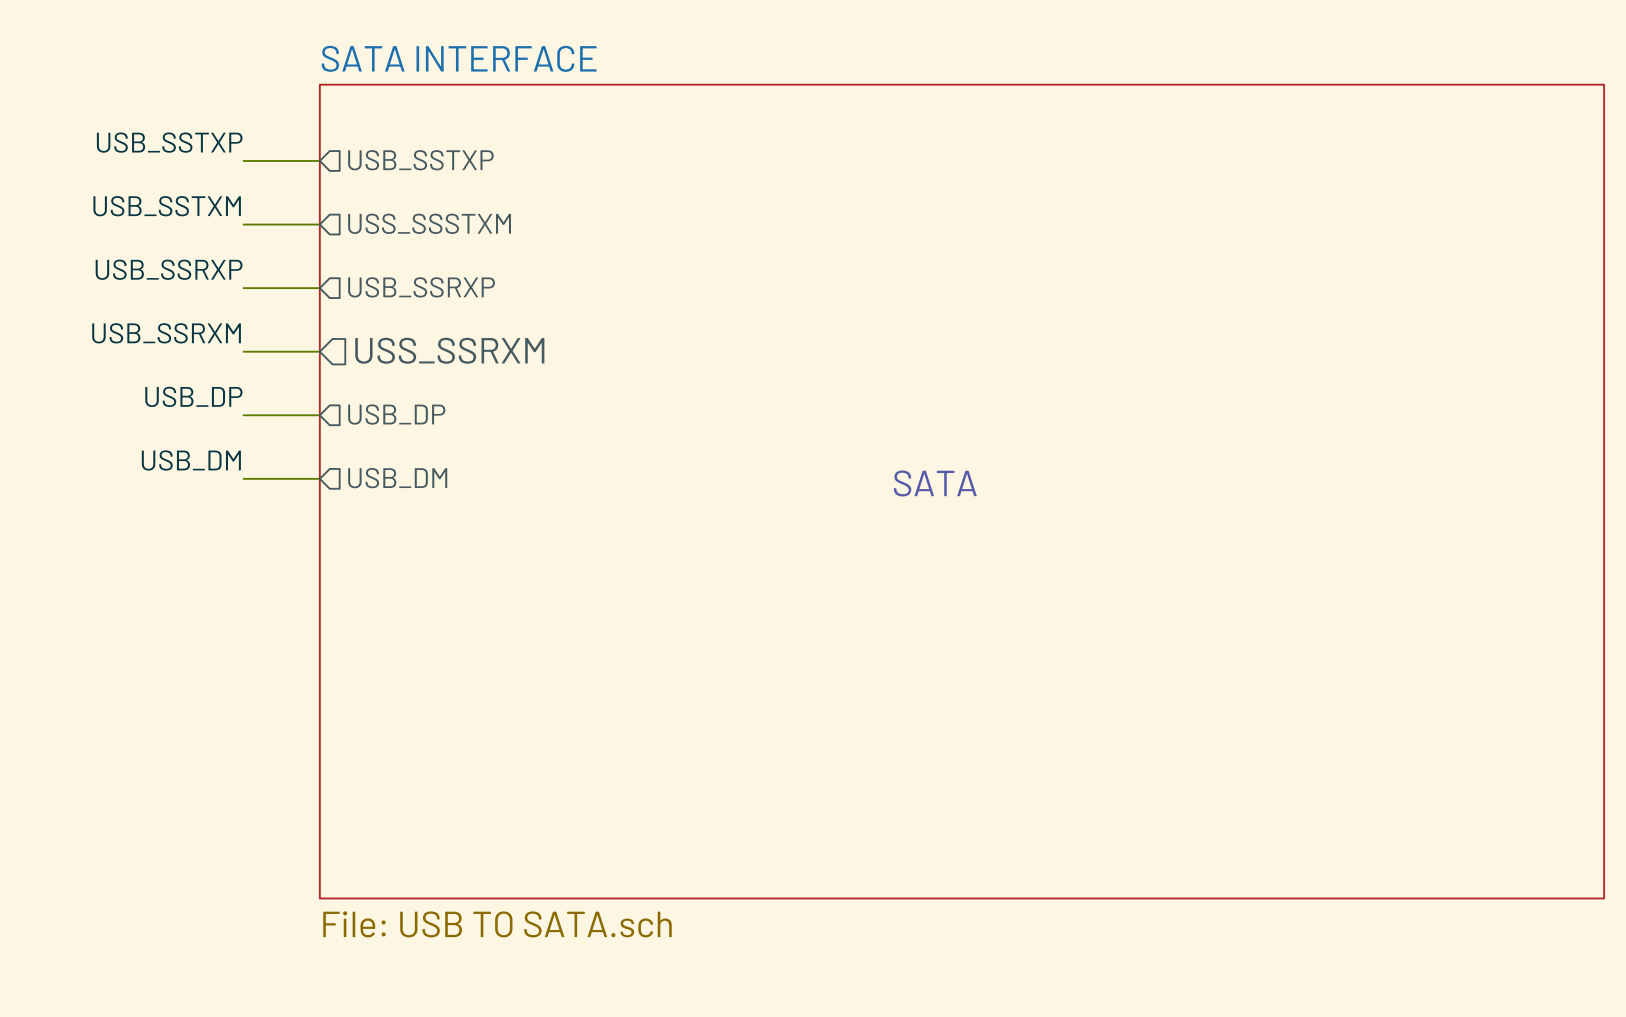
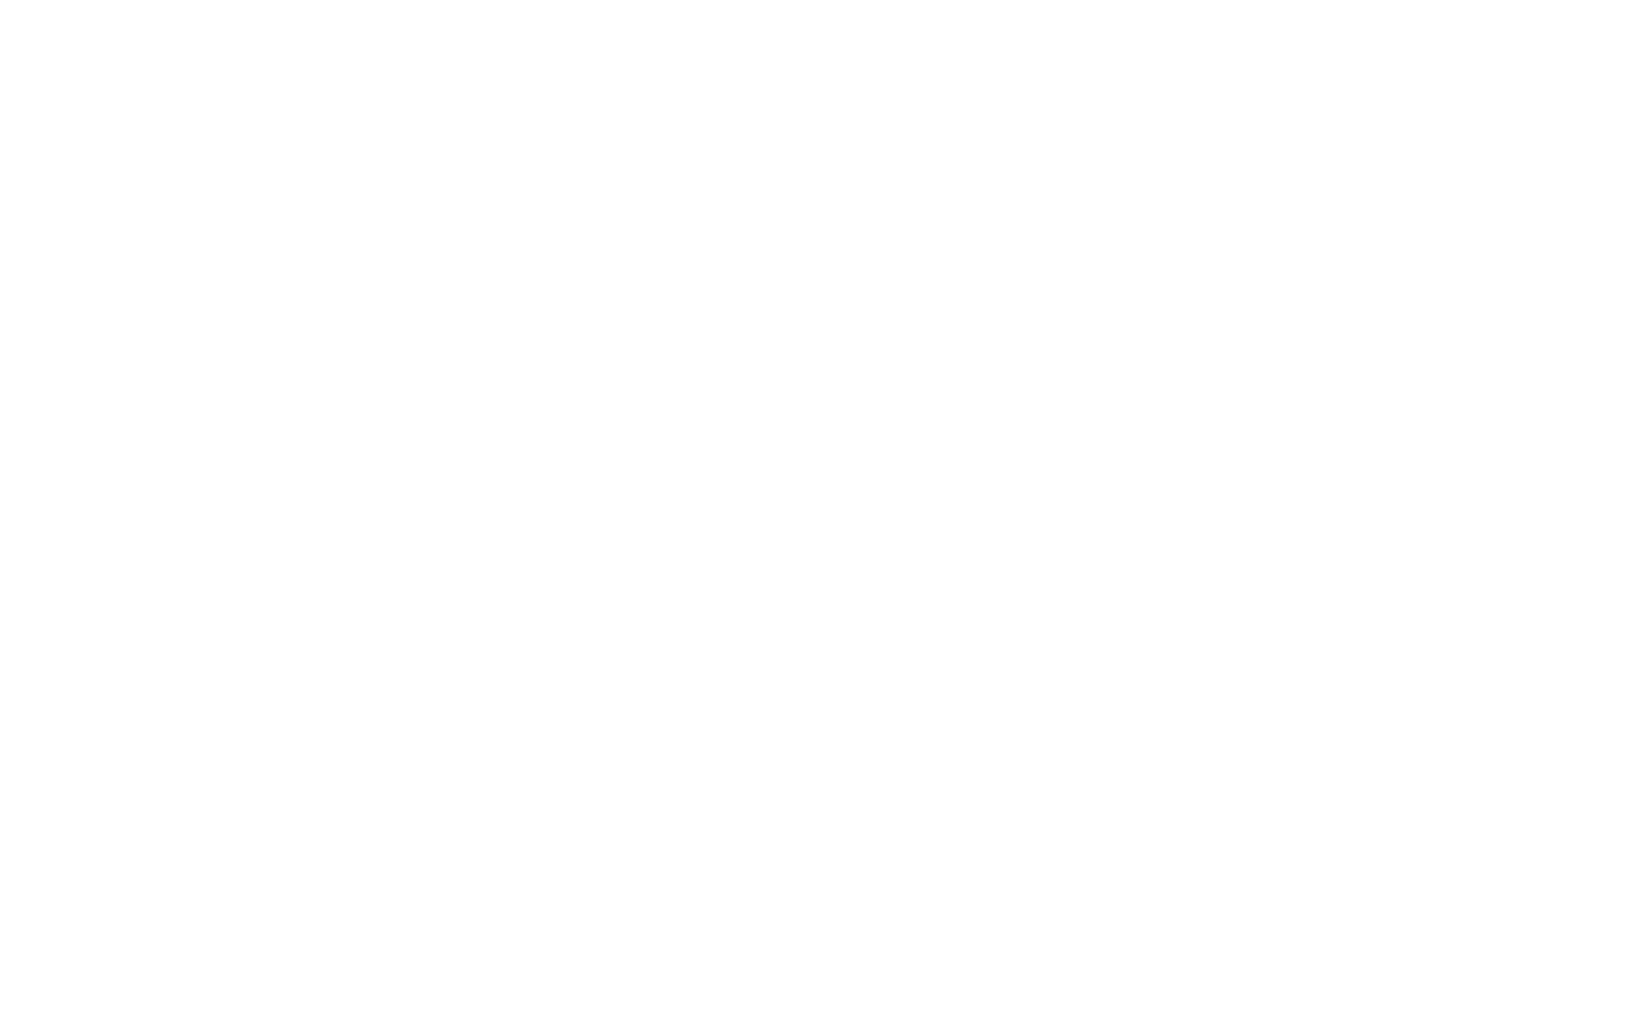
label: USB_SSTXP (169, 142) -> none
wire: (243, 160) (319, 160) -> none
sheet pin: USB_SSTXP (420, 160) -> none
label: USB_SSTXM (167, 206) -> none
sheet pin: USS_SSSTXM (429, 223) -> none
wire: (243, 224) (319, 224) -> none
label: USB_SSRXP (169, 269) -> none
sheet pin: USB_SSRXP (421, 287) -> none
wire: (243, 288) (319, 288) -> none
label: USB_SSRXM (166, 333) -> none
sheet pin: USS_SSRXM (449, 350) -> none
wire: (243, 351) (319, 351) -> none
label: USB_DP (193, 396) -> none
sheet pin: USB_DP (396, 414) -> none
wire: (243, 415) (319, 415) -> none
label: USB_DM (191, 460) -> none
wire: (243, 478) (319, 478) -> none
sheet pin: USB_DM (397, 478) -> none
text: SATA (935, 483) -> none
sheet SATA INTERFACE: File: USB TO SATA.sch (961, 491) -> none

